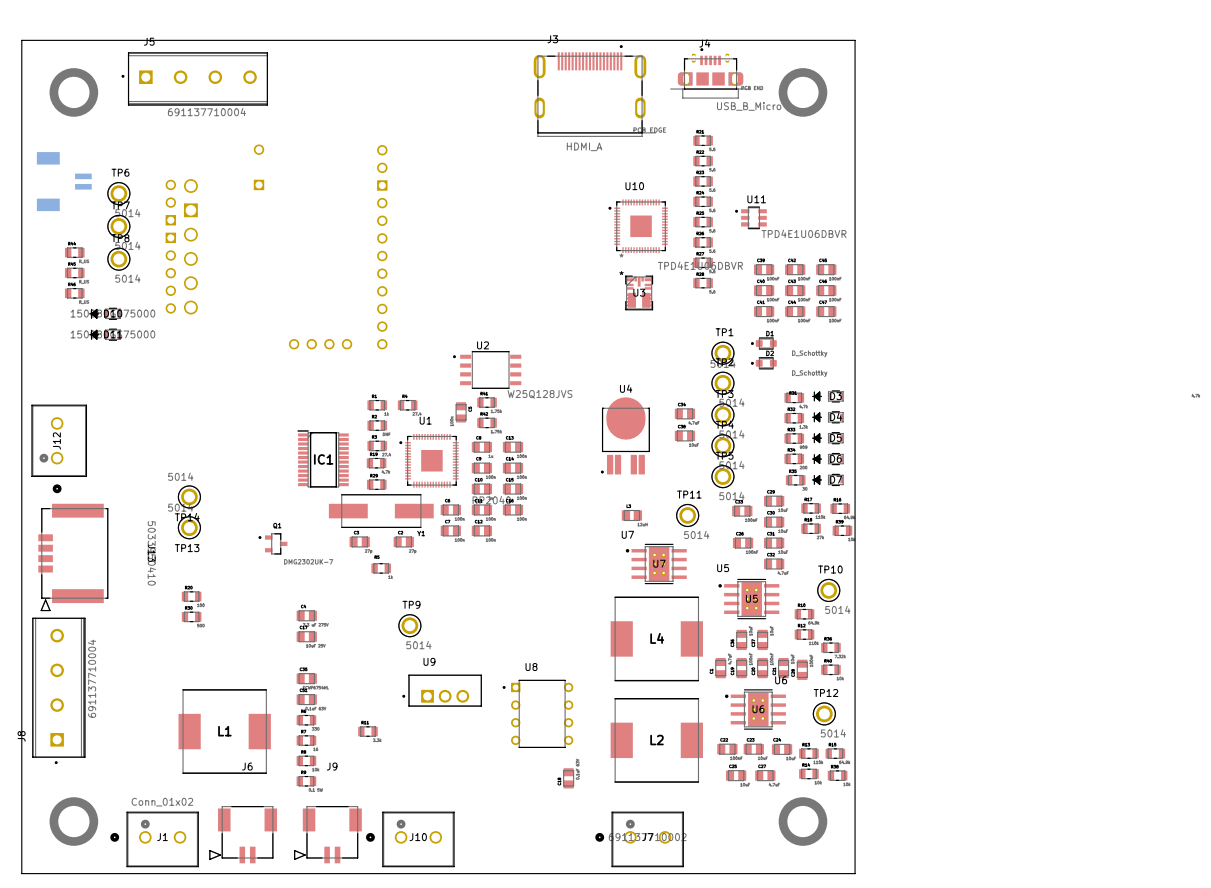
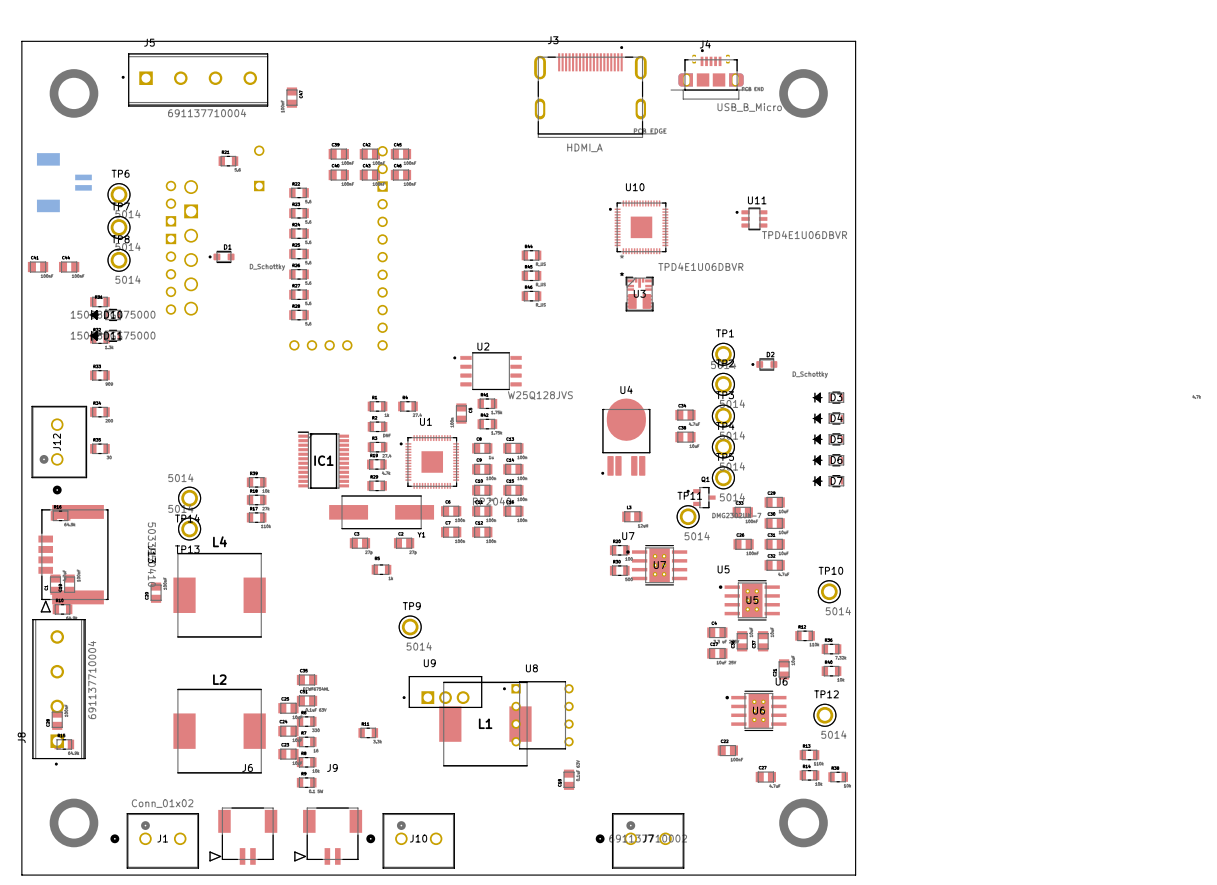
part position: (703, 140) -> (228, 161)
part position: (703, 161) -> (299, 192)
part position: (703, 181) -> (299, 213)
part position: (703, 201) -> (299, 233)
part position: (703, 222) -> (299, 253)
part position: (703, 242) -> (299, 274)
part position: (74, 252) -> (531, 255)
part position: (703, 262) -> (299, 294)
part position: (764, 269) -> (338, 154)
part position: (795, 269) -> (369, 154)
part position: (826, 269) -> (400, 154)
part position: (74, 272) -> (531, 275)
part position: (703, 283) -> (299, 315)
part position: (764, 290) -> (338, 175)
part position: (795, 290) -> (369, 175)
part position: (826, 290) -> (400, 175)
part position: (74, 293) -> (531, 296)
part position: (764, 311) -> (38, 267)
part position: (795, 311) -> (69, 267)
part rotation: 0° (826, 311) -> 90° clockwise (291, 97)
part position: (826, 311) -> (291, 97)
part position: (763, 343) -> (221, 256)
part position: (794, 397) -> (99, 301)
part position: (794, 418) -> (99, 338)
part position: (794, 438) -> (99, 375)
part position: (794, 458) -> (99, 412)
part position: (795, 480) -> (99, 448)
part position: (811, 508) -> (256, 517)
part position: (840, 508) -> (60, 515)
part position: (811, 528) -> (256, 499)
part position: (842, 530) -> (256, 482)
part position: (273, 543) -> (701, 497)
part position: (191, 596) -> (619, 550)
part position: (804, 614) -> (62, 609)
part position: (306, 615) -> (717, 632)
part position: (191, 616) -> (619, 570)
part position: (306, 636) -> (717, 653)
L4 position: (656, 638) -> (219, 595)
L4 name position: L4 (657, 638) -> L4 (220, 541)
part position: (720, 668) -> (55, 584)
part position: (741, 668) -> (69, 584)
part position: (762, 668) -> (156, 592)
part position: (802, 669) -> (57, 719)
L1 position: (224, 731) -> (485, 724)
L2 position: (656, 740) -> (219, 731)
L2 name position: L2 (657, 740) -> L2 (219, 679)
part position: (753, 749) -> (288, 754)
part position: (782, 749) -> (288, 731)
part position: (835, 753) -> (64, 744)
part position: (736, 775) -> (288, 708)

